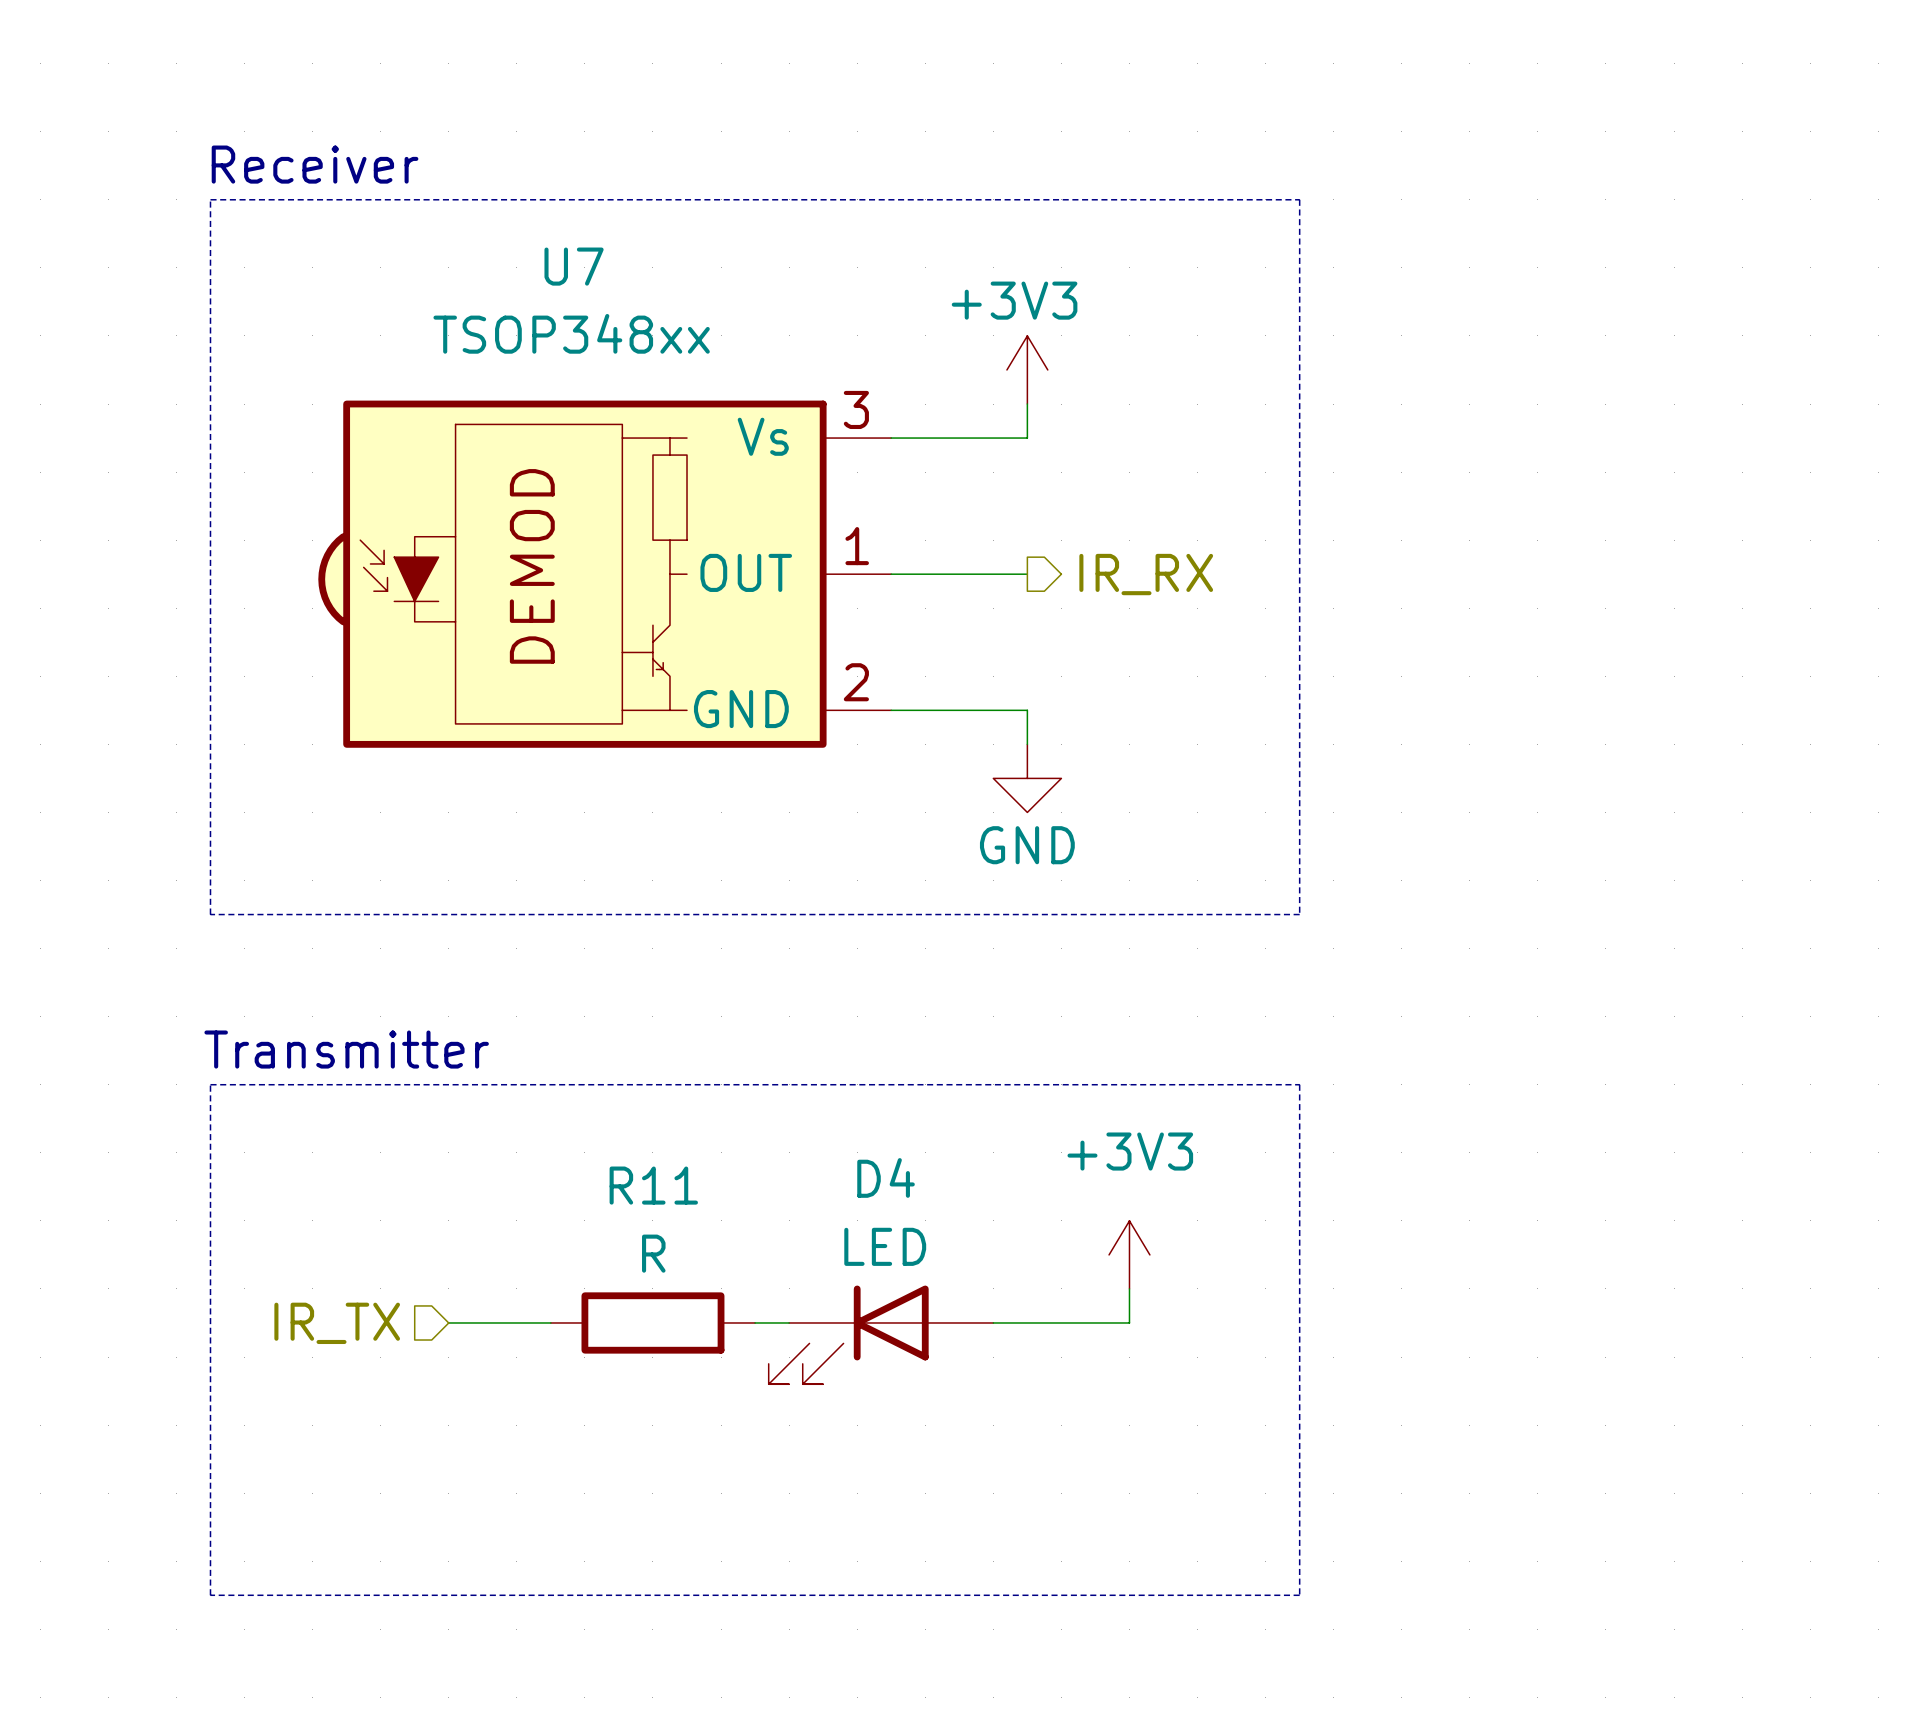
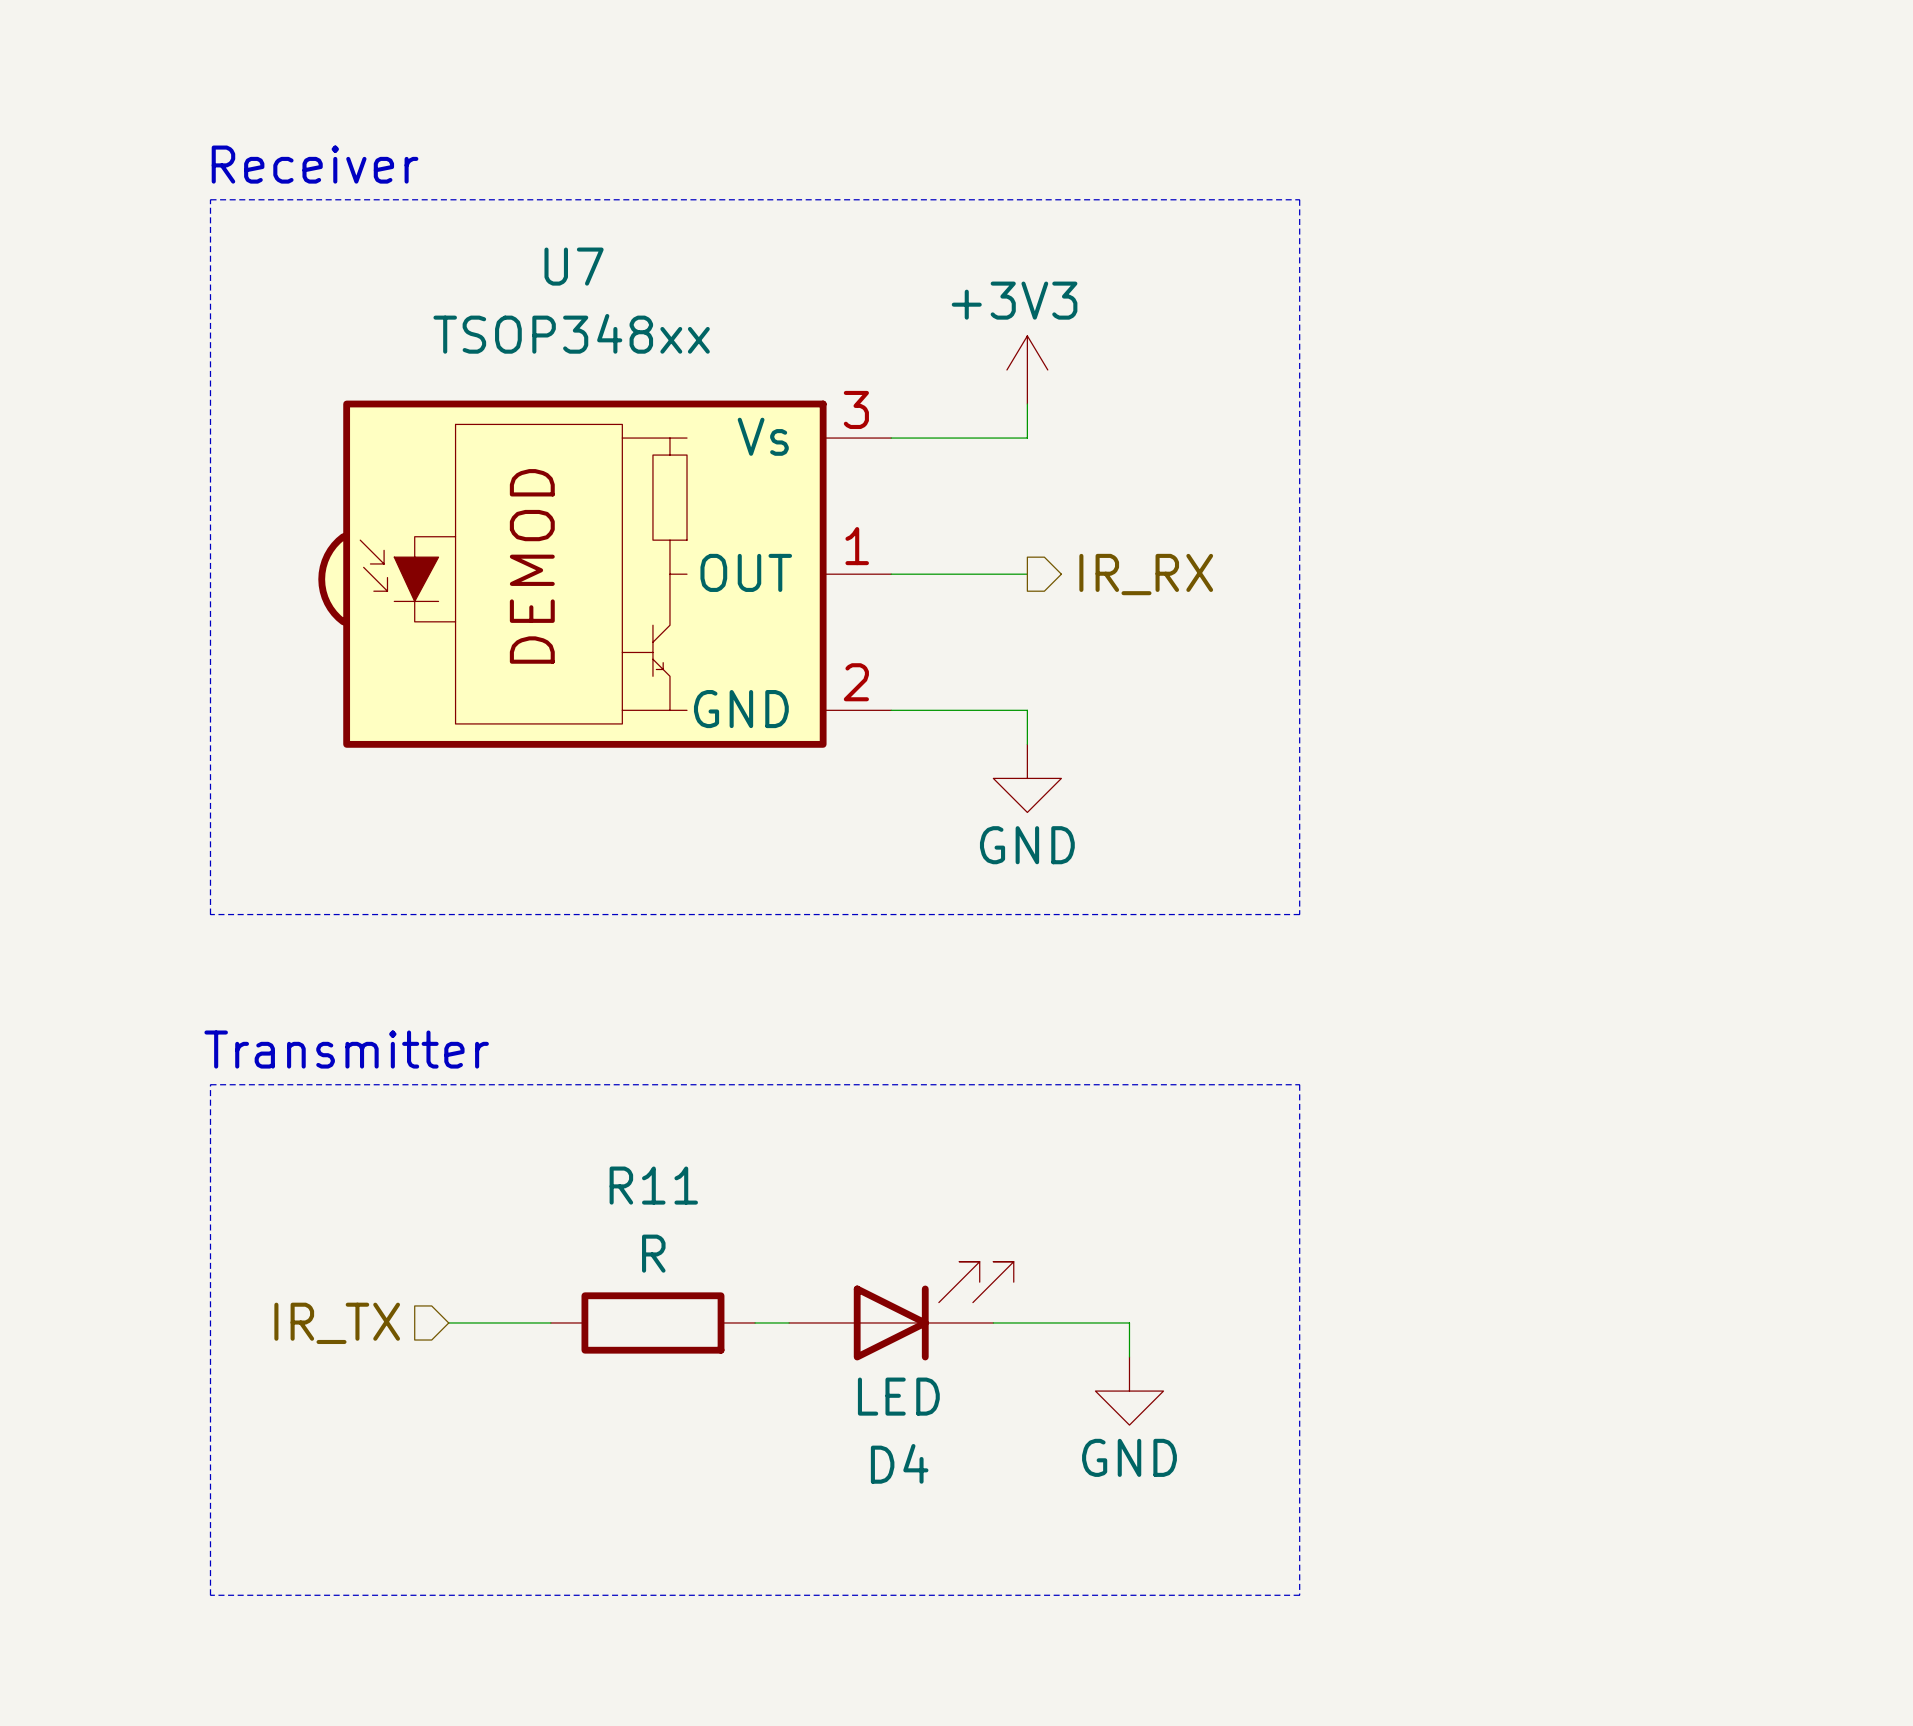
power symbol: +3V3 (1129, 1254) -> none
wire: (1129, 1288) (1129, 1322) -> (1129, 1357) (1129, 1322)
D4 rotation: 0° (848, 1334) -> 180° (933, 1311)
power symbol: none -> GND (1129, 1391)

